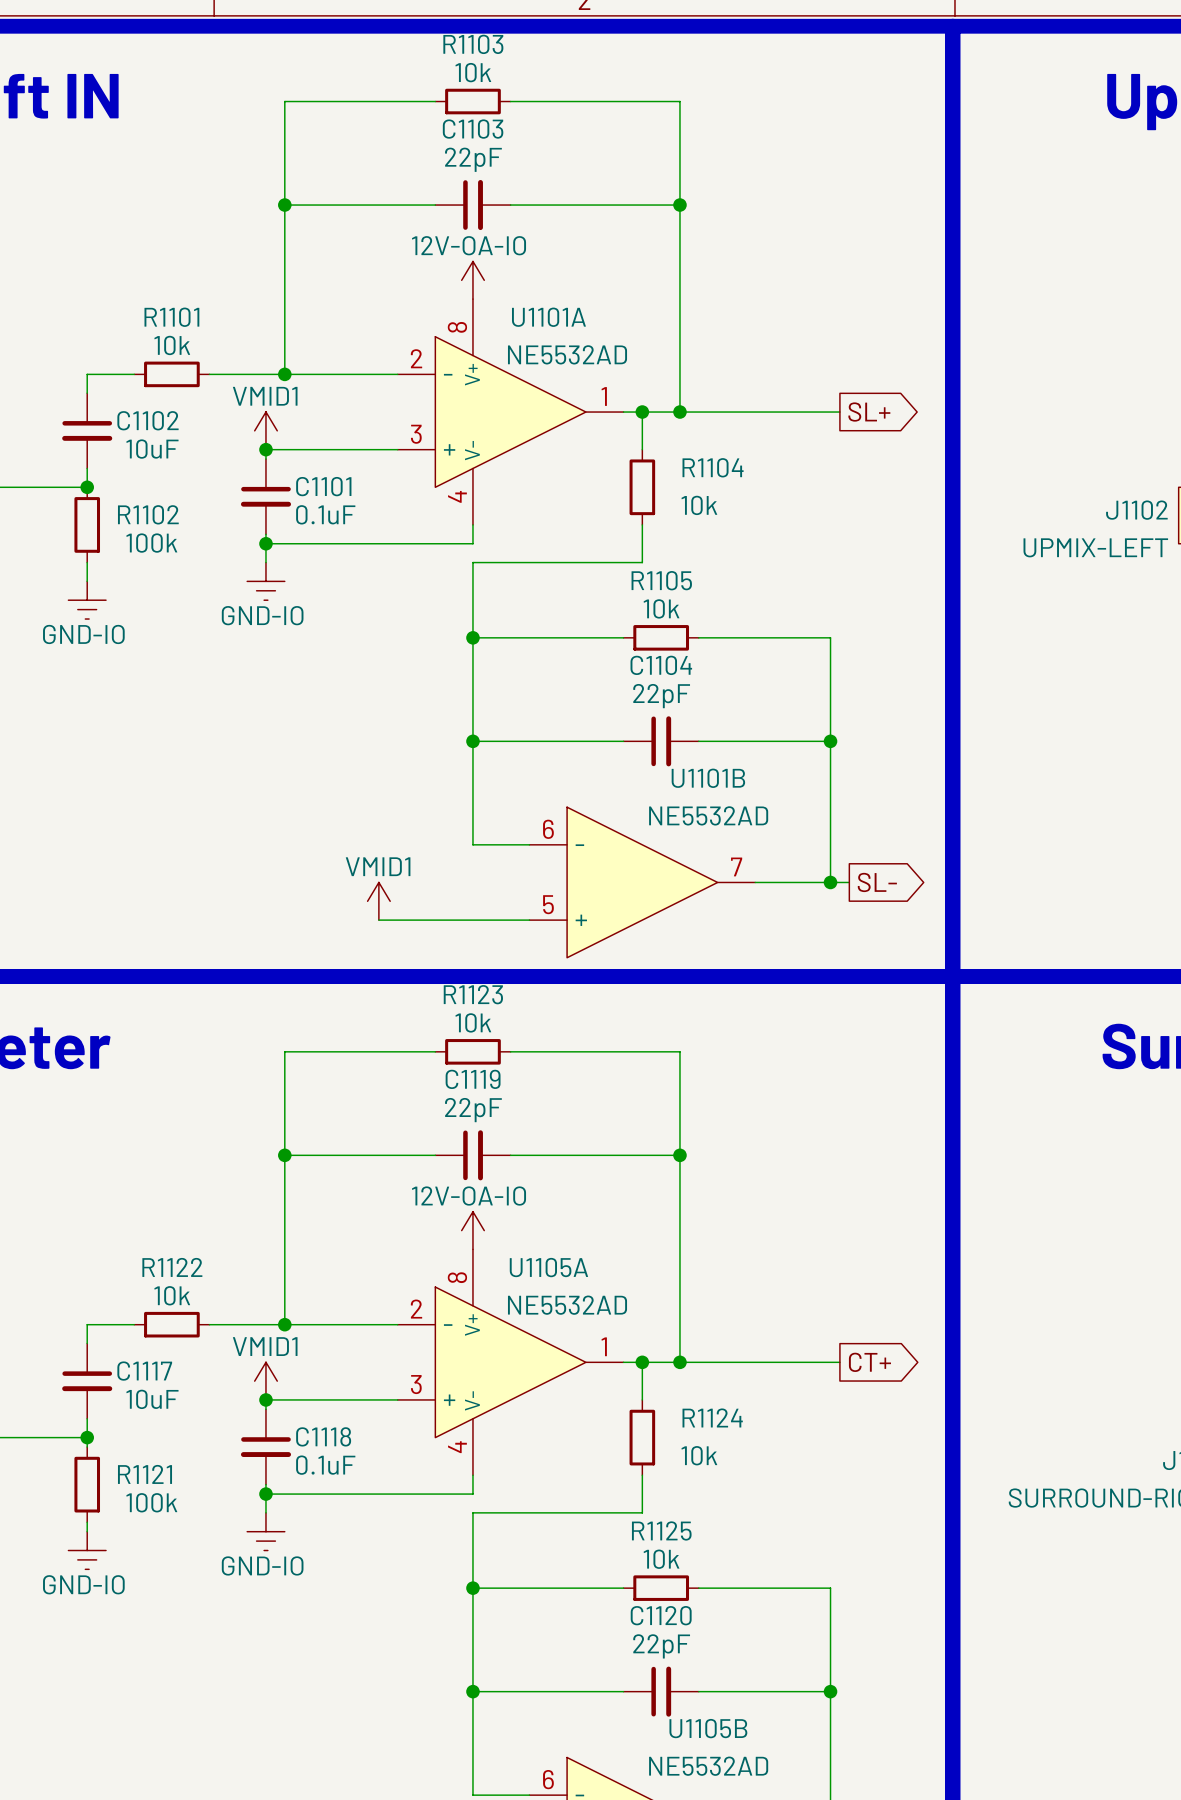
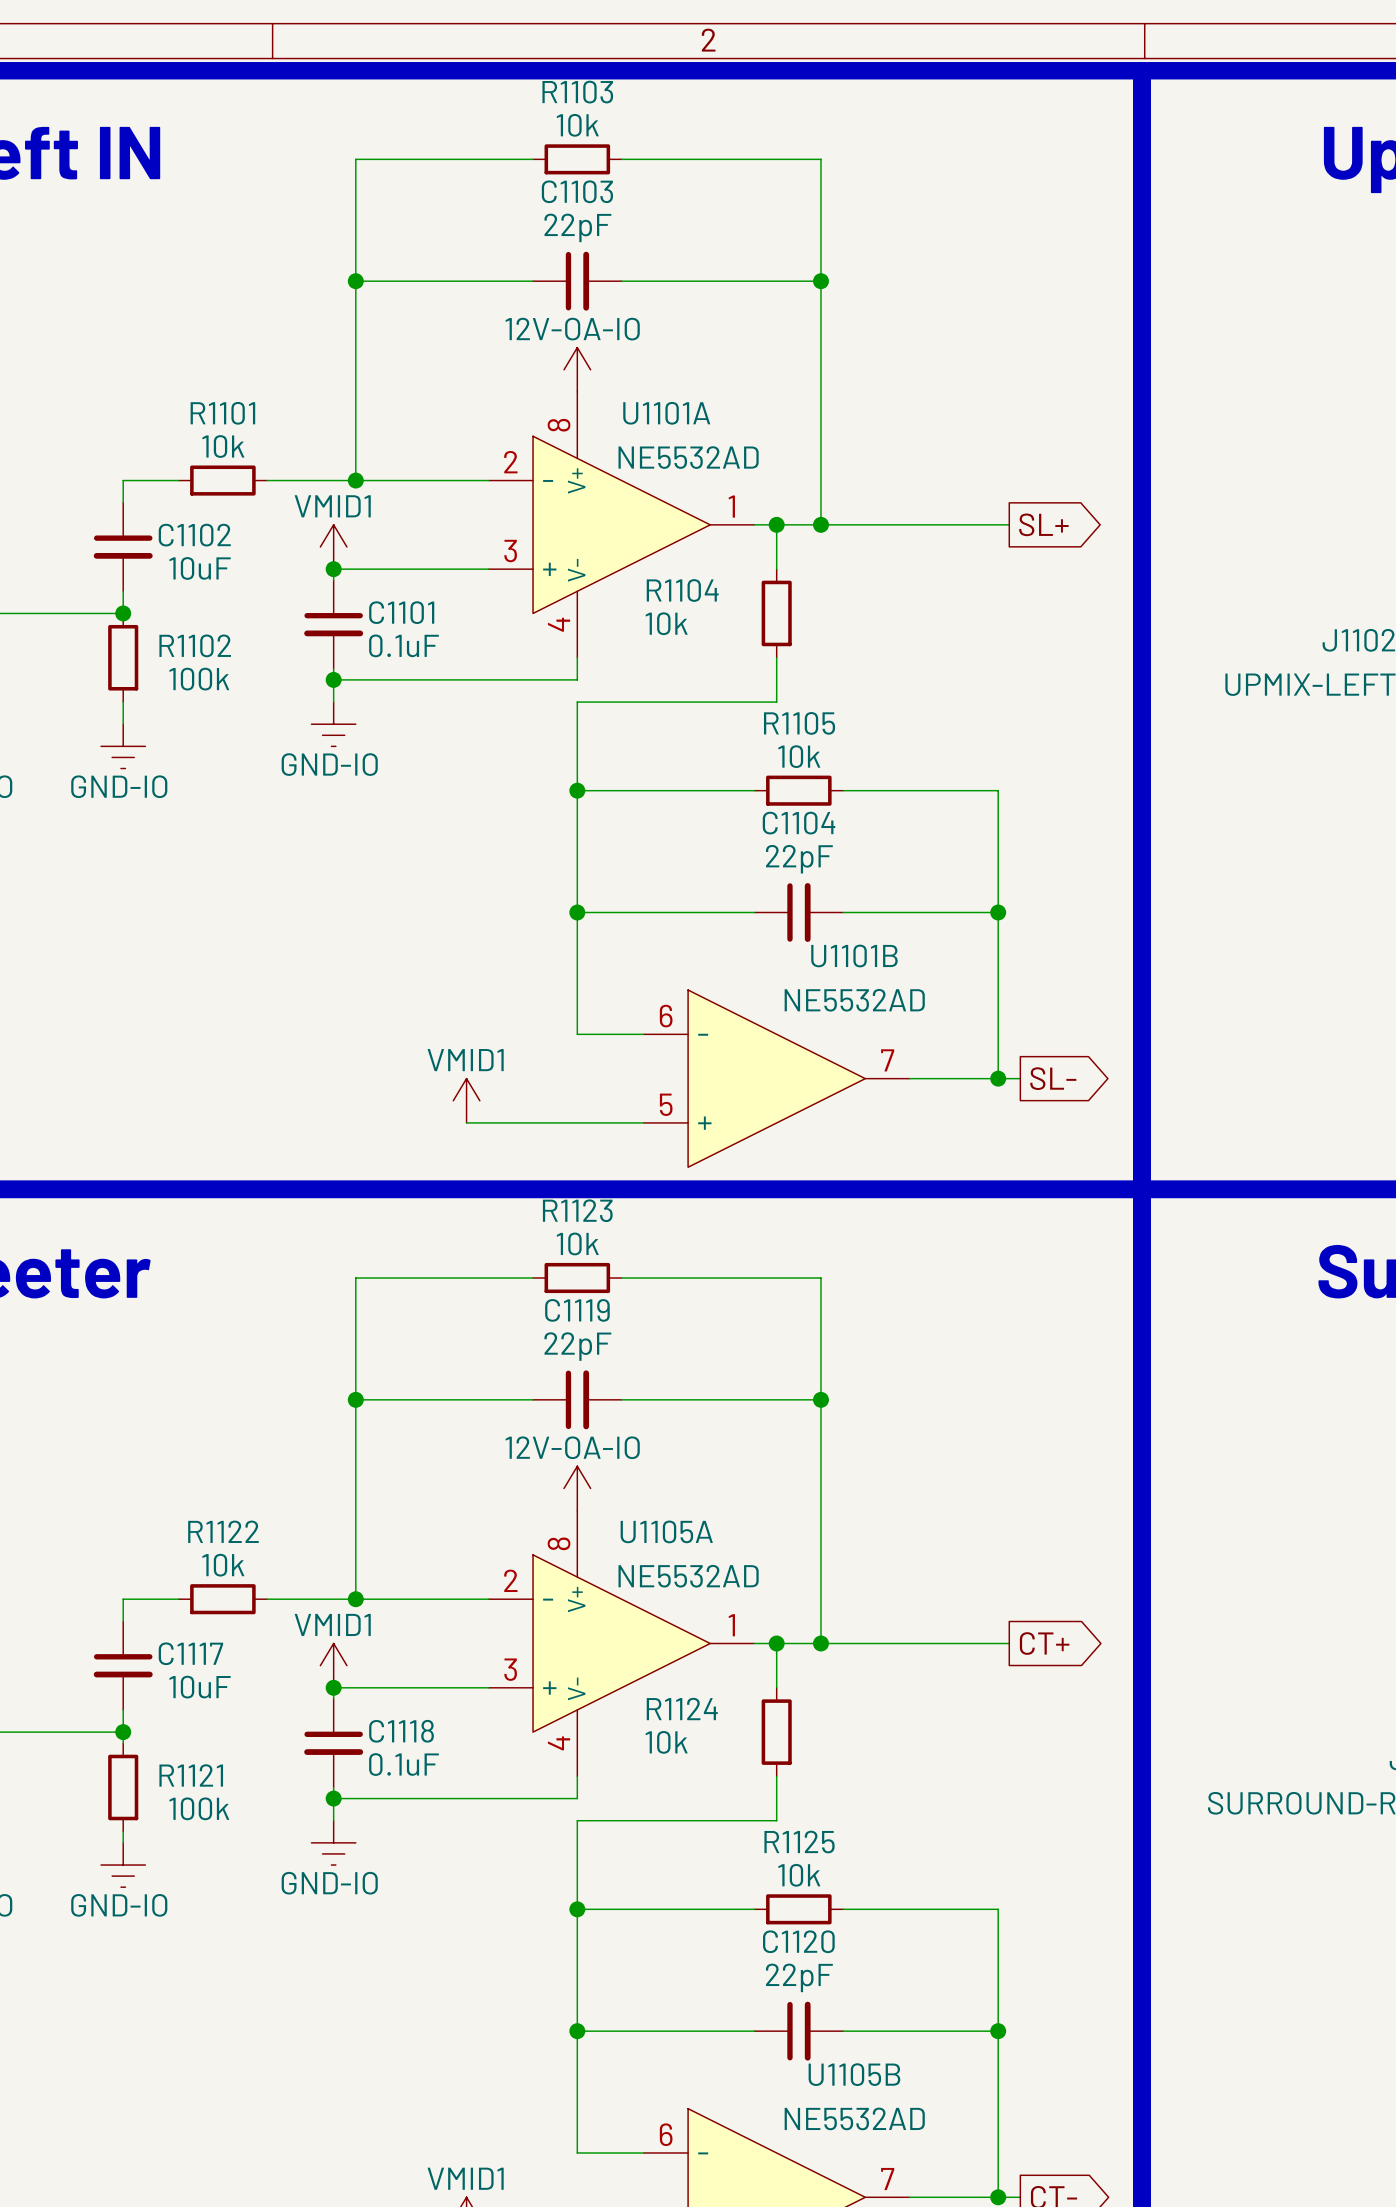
R1104 name position: R1104 (713, 467) -> R1104 (682, 590)
R1104 value position: 10k (699, 505) -> 10k (666, 623)
R1124 name position: R1124 (712, 1417) -> R1124 (682, 1709)
R1124 value position: 10k (699, 1455) -> 10k (666, 1742)

